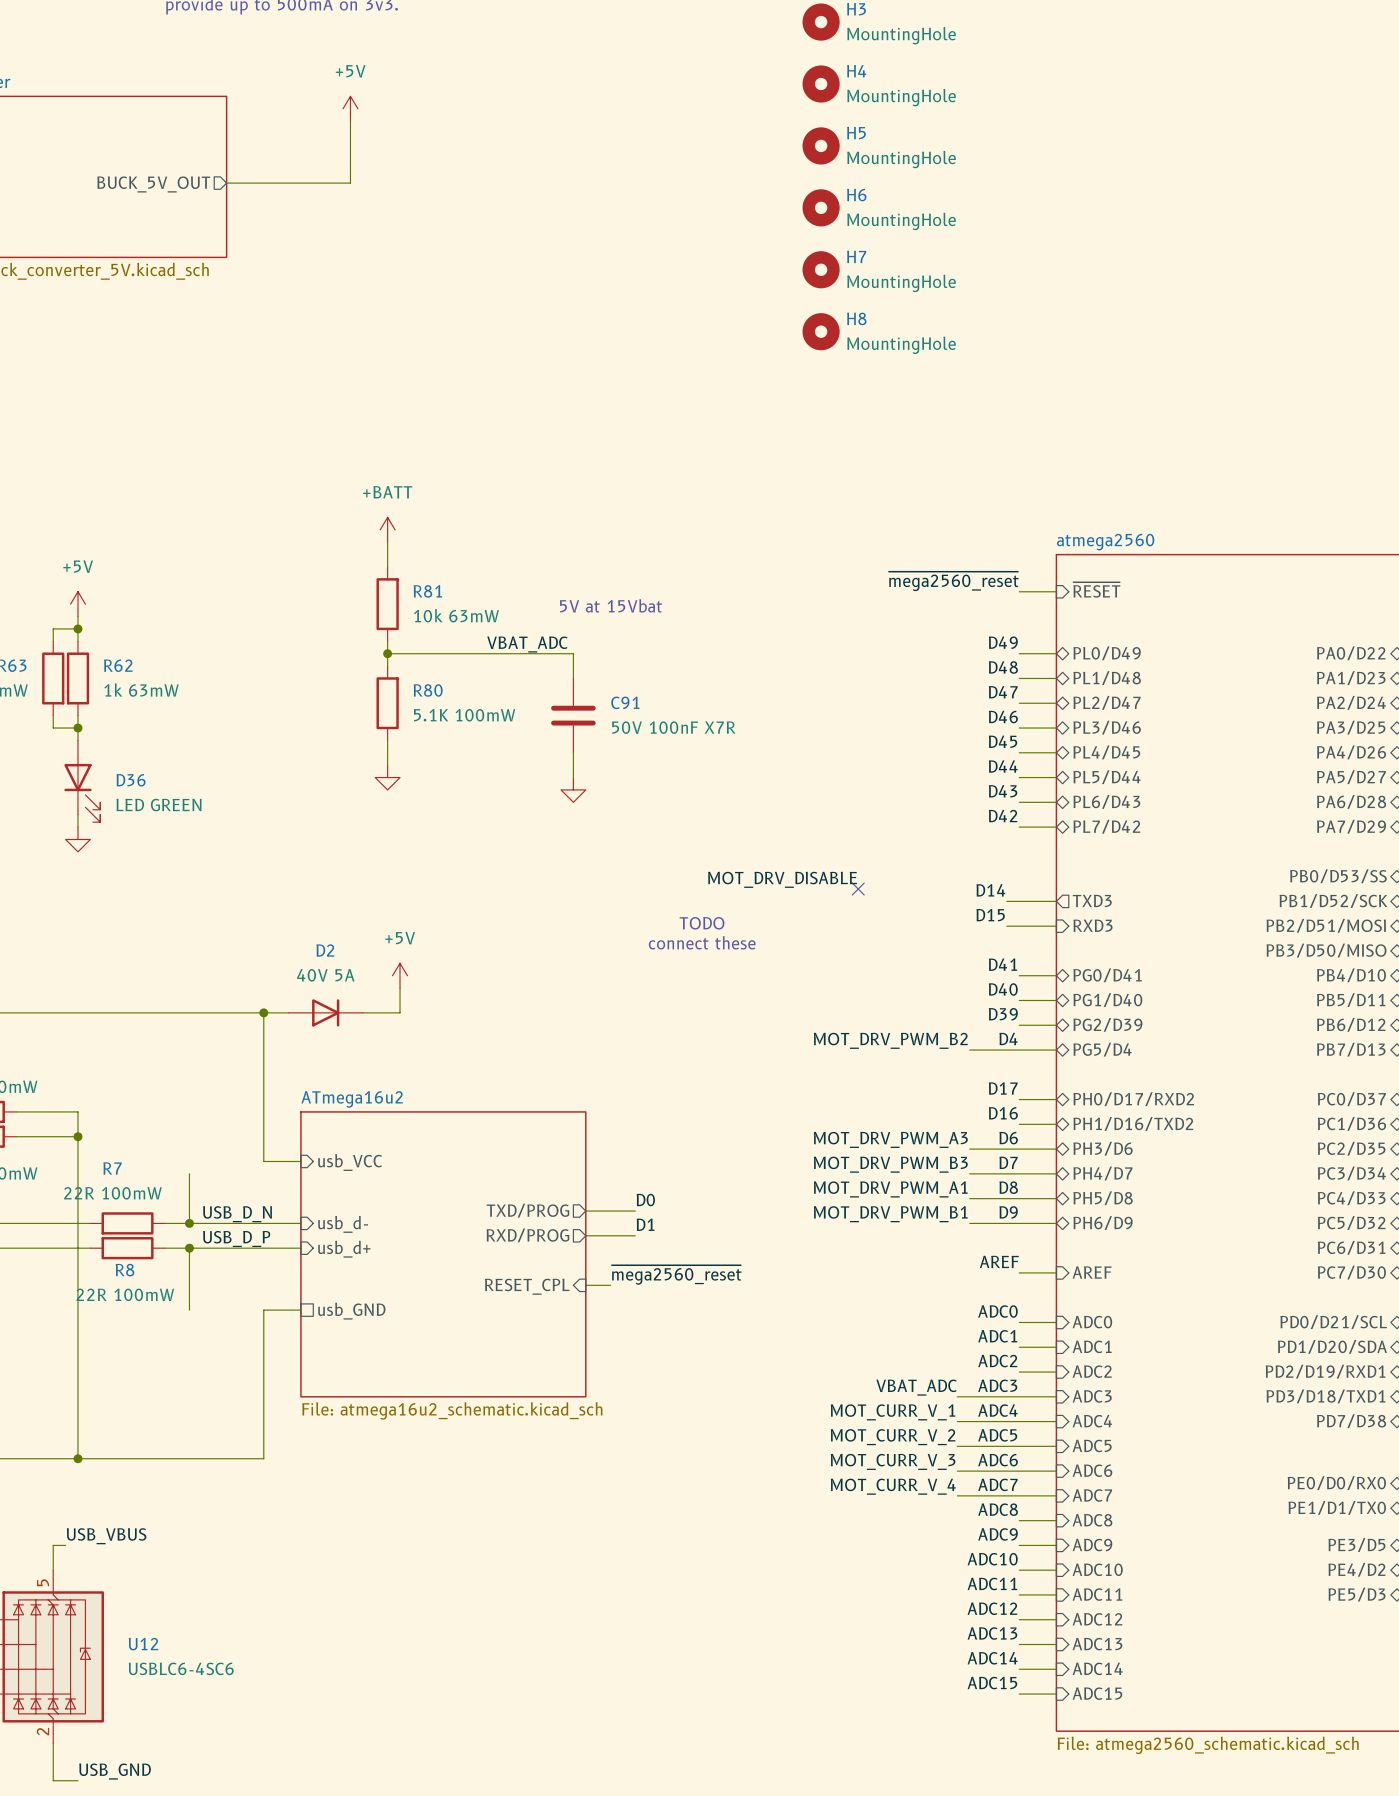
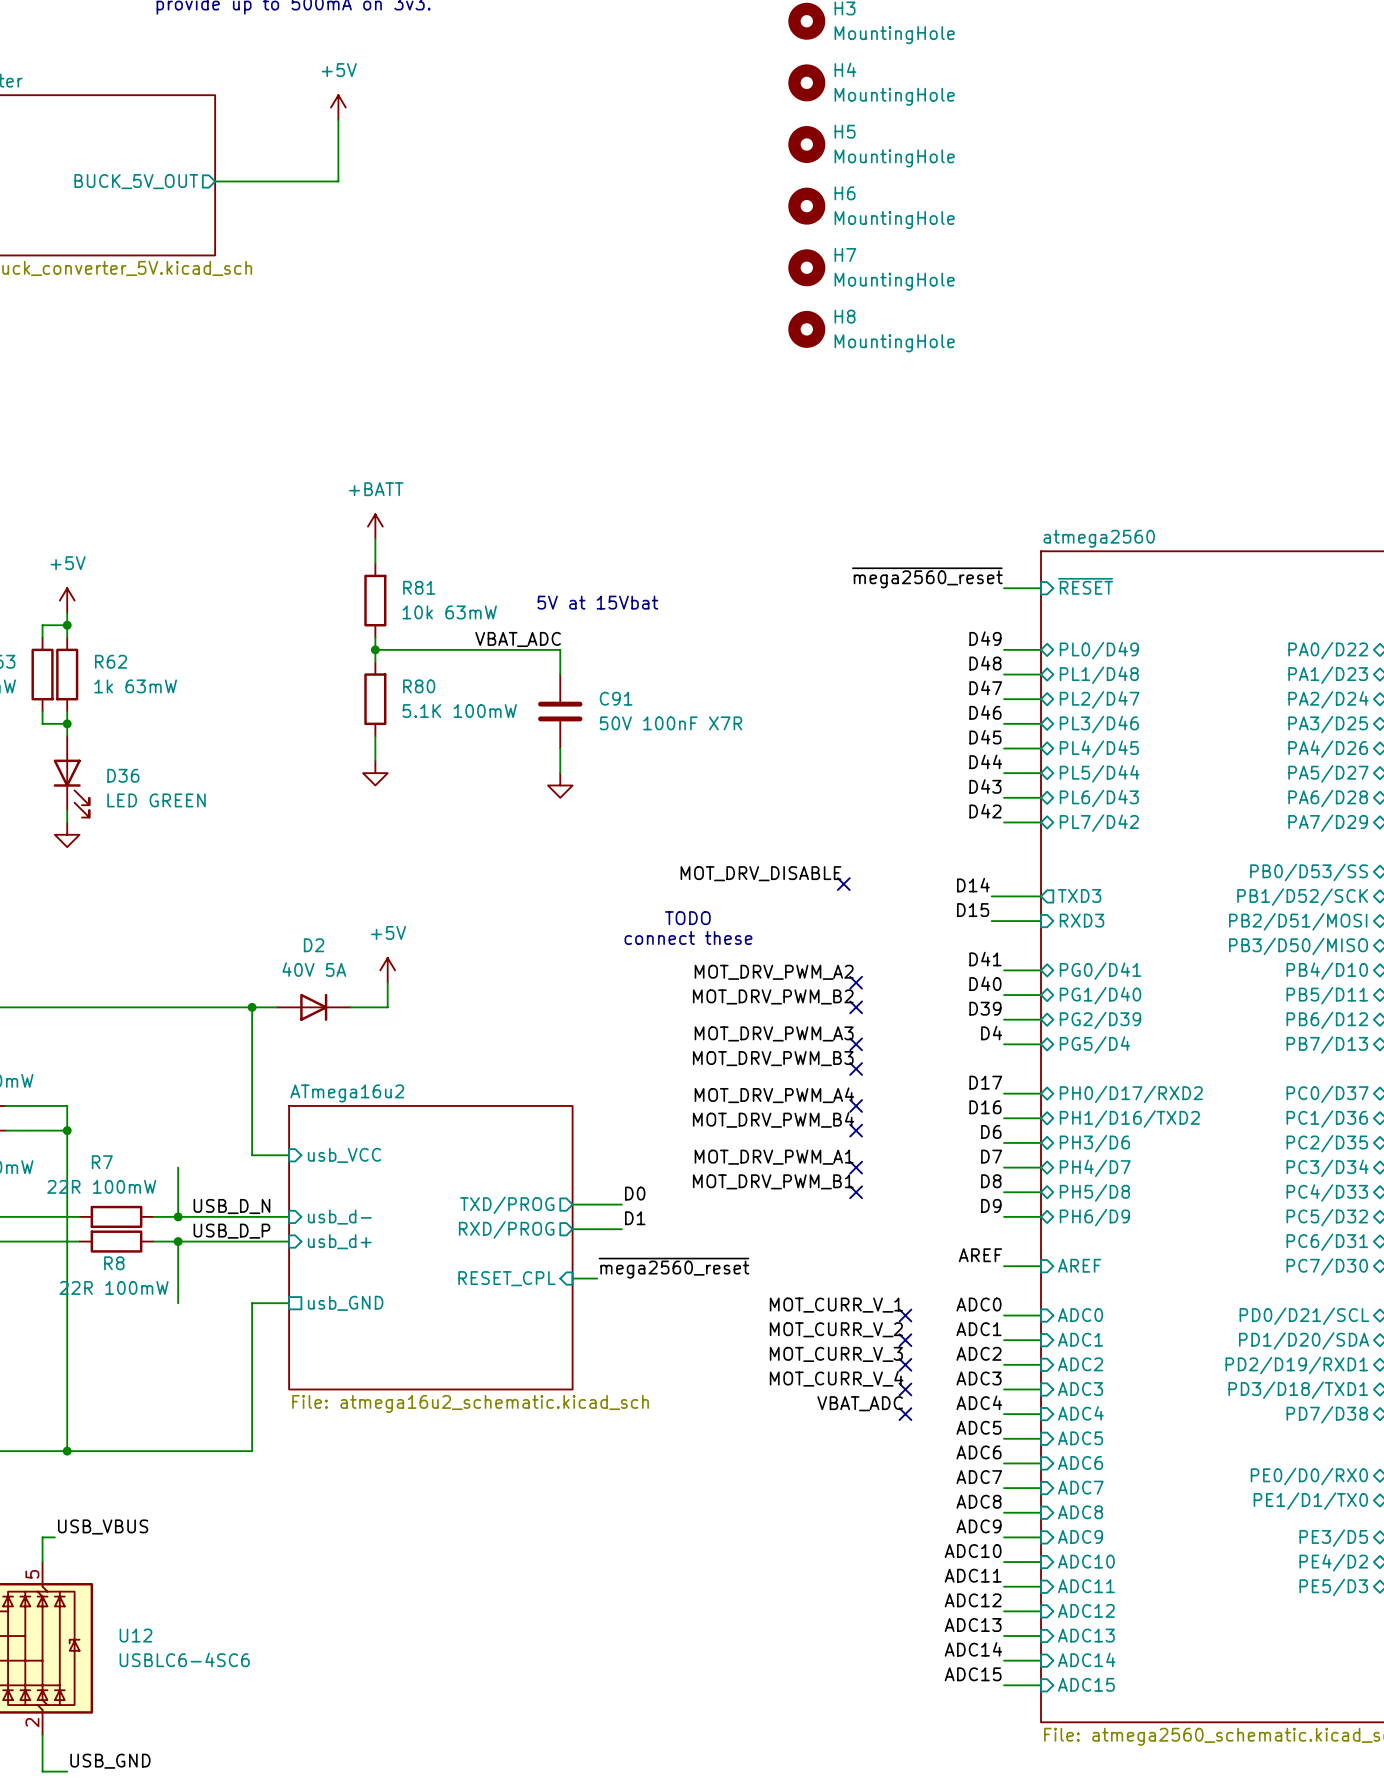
label: none -> MOT_DRV_PWM_A2 (774, 972)
no-connect mark: none -> (856, 982)
no-connect mark: none -> (856, 1007)
label position: MOT_DRV_PWM_B2 (890, 1040) -> MOT_DRV_PWM_B2 (773, 996)
no-connect mark: none -> (856, 1044)
wire: (969, 1050) (1019, 1050) -> none
no-connect mark: none -> (856, 1068)
label: none -> MOT_DRV_PWM_A4 (774, 1095)
no-connect mark: none -> (856, 1105)
label: none -> MOT_DRV_PWM_B4 (773, 1119)
no-connect mark: none -> (856, 1130)
label position: MOT_DRV_PWM_A3 (890, 1139) -> MOT_DRV_PWM_A3 (774, 1033)
wire: (969, 1149) (1019, 1149) -> none
label position: MOT_DRV_PWM_B3 (890, 1164) -> MOT_DRV_PWM_B3 (773, 1058)
no-connect mark: none -> (856, 1167)
wire: (969, 1173) (1019, 1173) -> none
label position: MOT_DRV_PWM_A1 (890, 1189) -> MOT_DRV_PWM_A1 (774, 1157)
no-connect mark: none -> (856, 1192)
wire: (969, 1198) (1019, 1198) -> none
label position: MOT_DRV_PWM_B1 (890, 1214) -> MOT_DRV_PWM_B1 (773, 1181)
wire: (969, 1223) (1019, 1223) -> none
no-connect mark: none -> (905, 1315)
no-connect mark: none -> (905, 1340)
no-connect mark: none -> (905, 1364)
label position: VBAT_ADC (916, 1387) -> VBAT_ADC (860, 1403)
no-connect mark: none -> (905, 1389)
wire: (957, 1396) (1019, 1396) -> none
label position: MOT_CURR_V_1 (893, 1412) -> MOT_CURR_V_1 (836, 1305)
no-connect mark: none -> (905, 1414)
wire: (957, 1421) (1019, 1421) -> none
label position: MOT_CURR_V_2 (893, 1437) -> MOT_CURR_V_2 (836, 1329)
wire: (957, 1446) (1019, 1446) -> none
label position: MOT_CURR_V_3 (893, 1461) -> MOT_CURR_V_3 (836, 1354)
wire: (957, 1471) (1019, 1471) -> none
label position: MOT_CURR_V_4 (893, 1486) -> MOT_CURR_V_4 (836, 1378)
wire: (957, 1495) (1019, 1495) -> none

